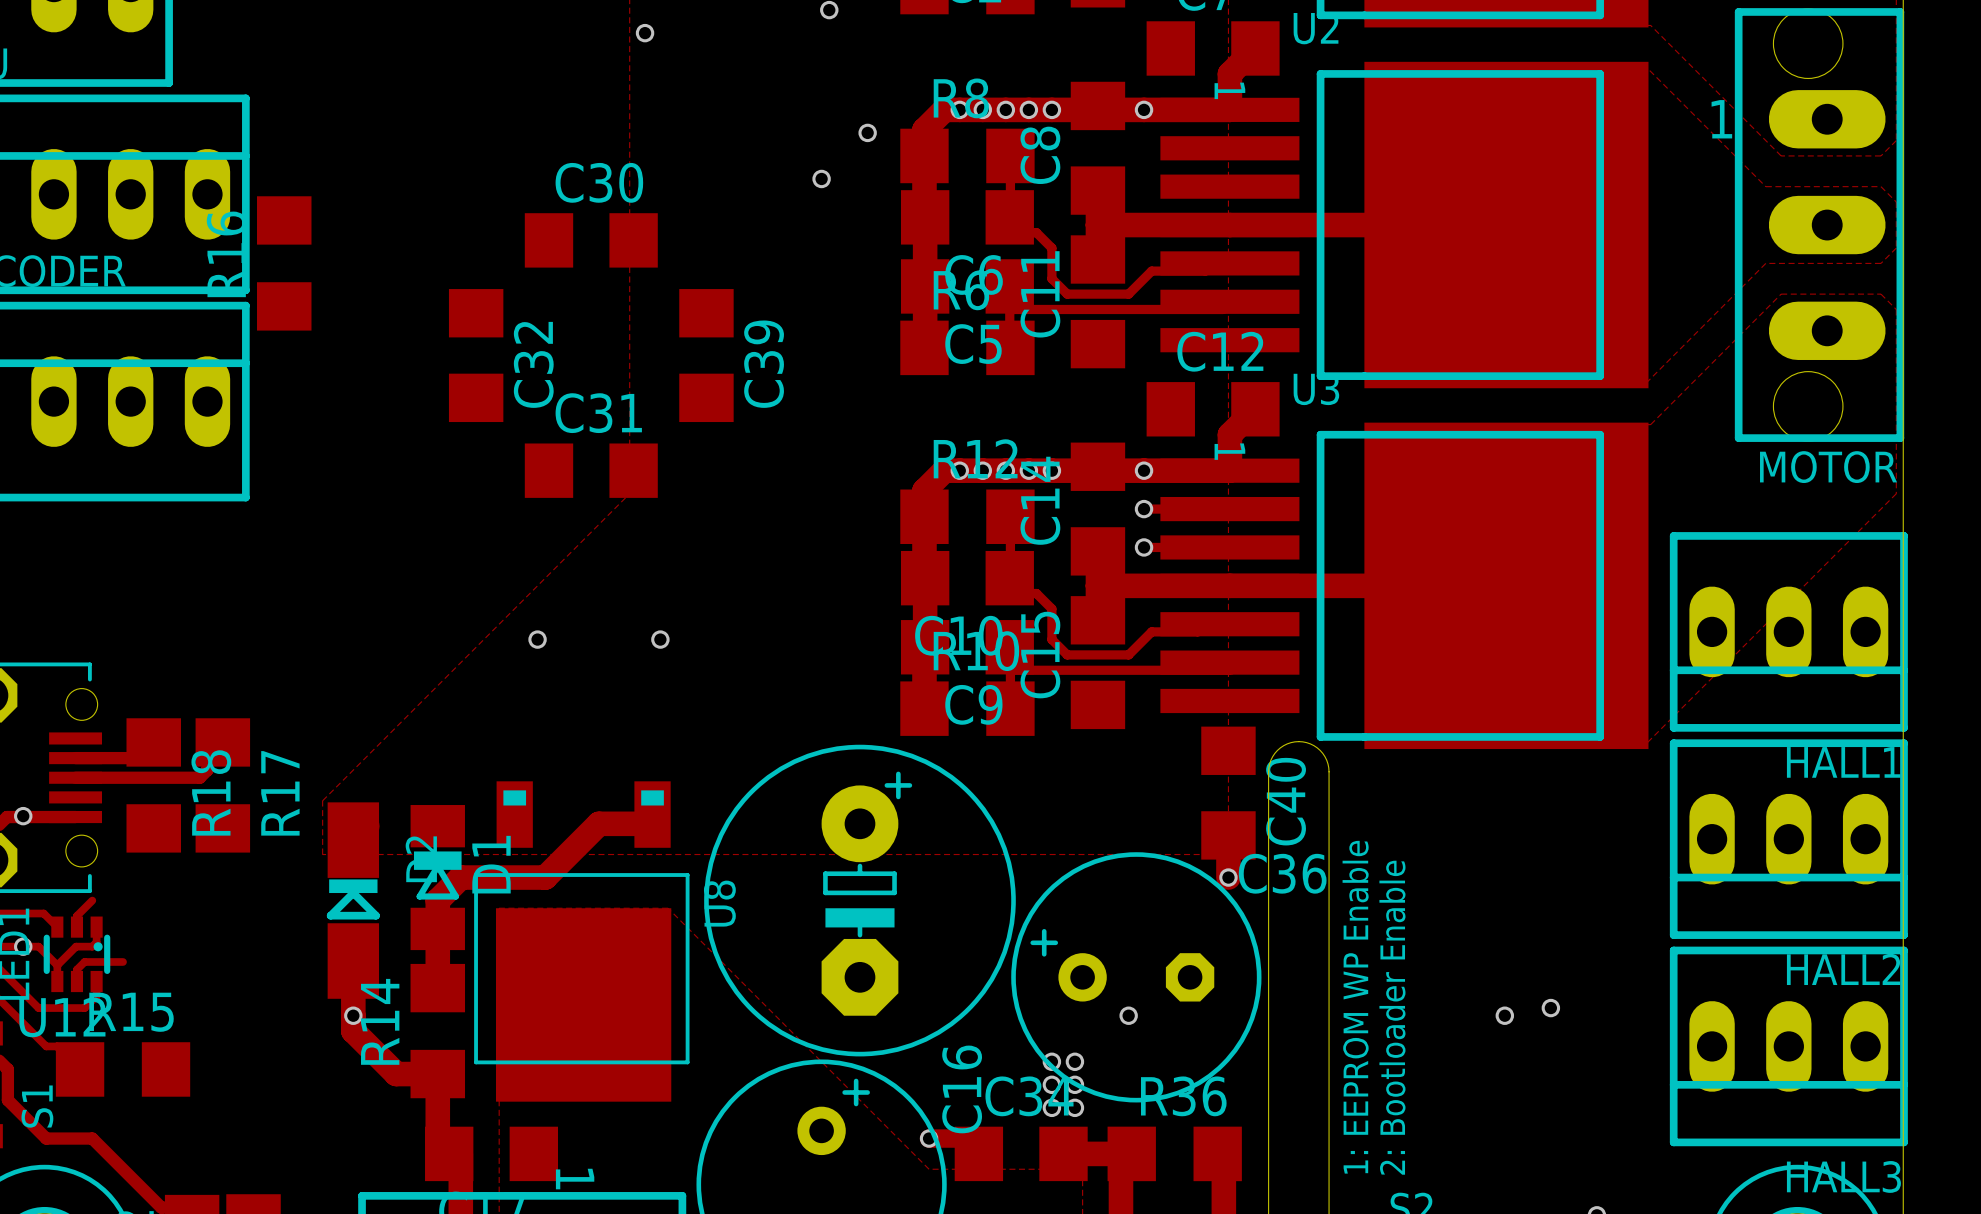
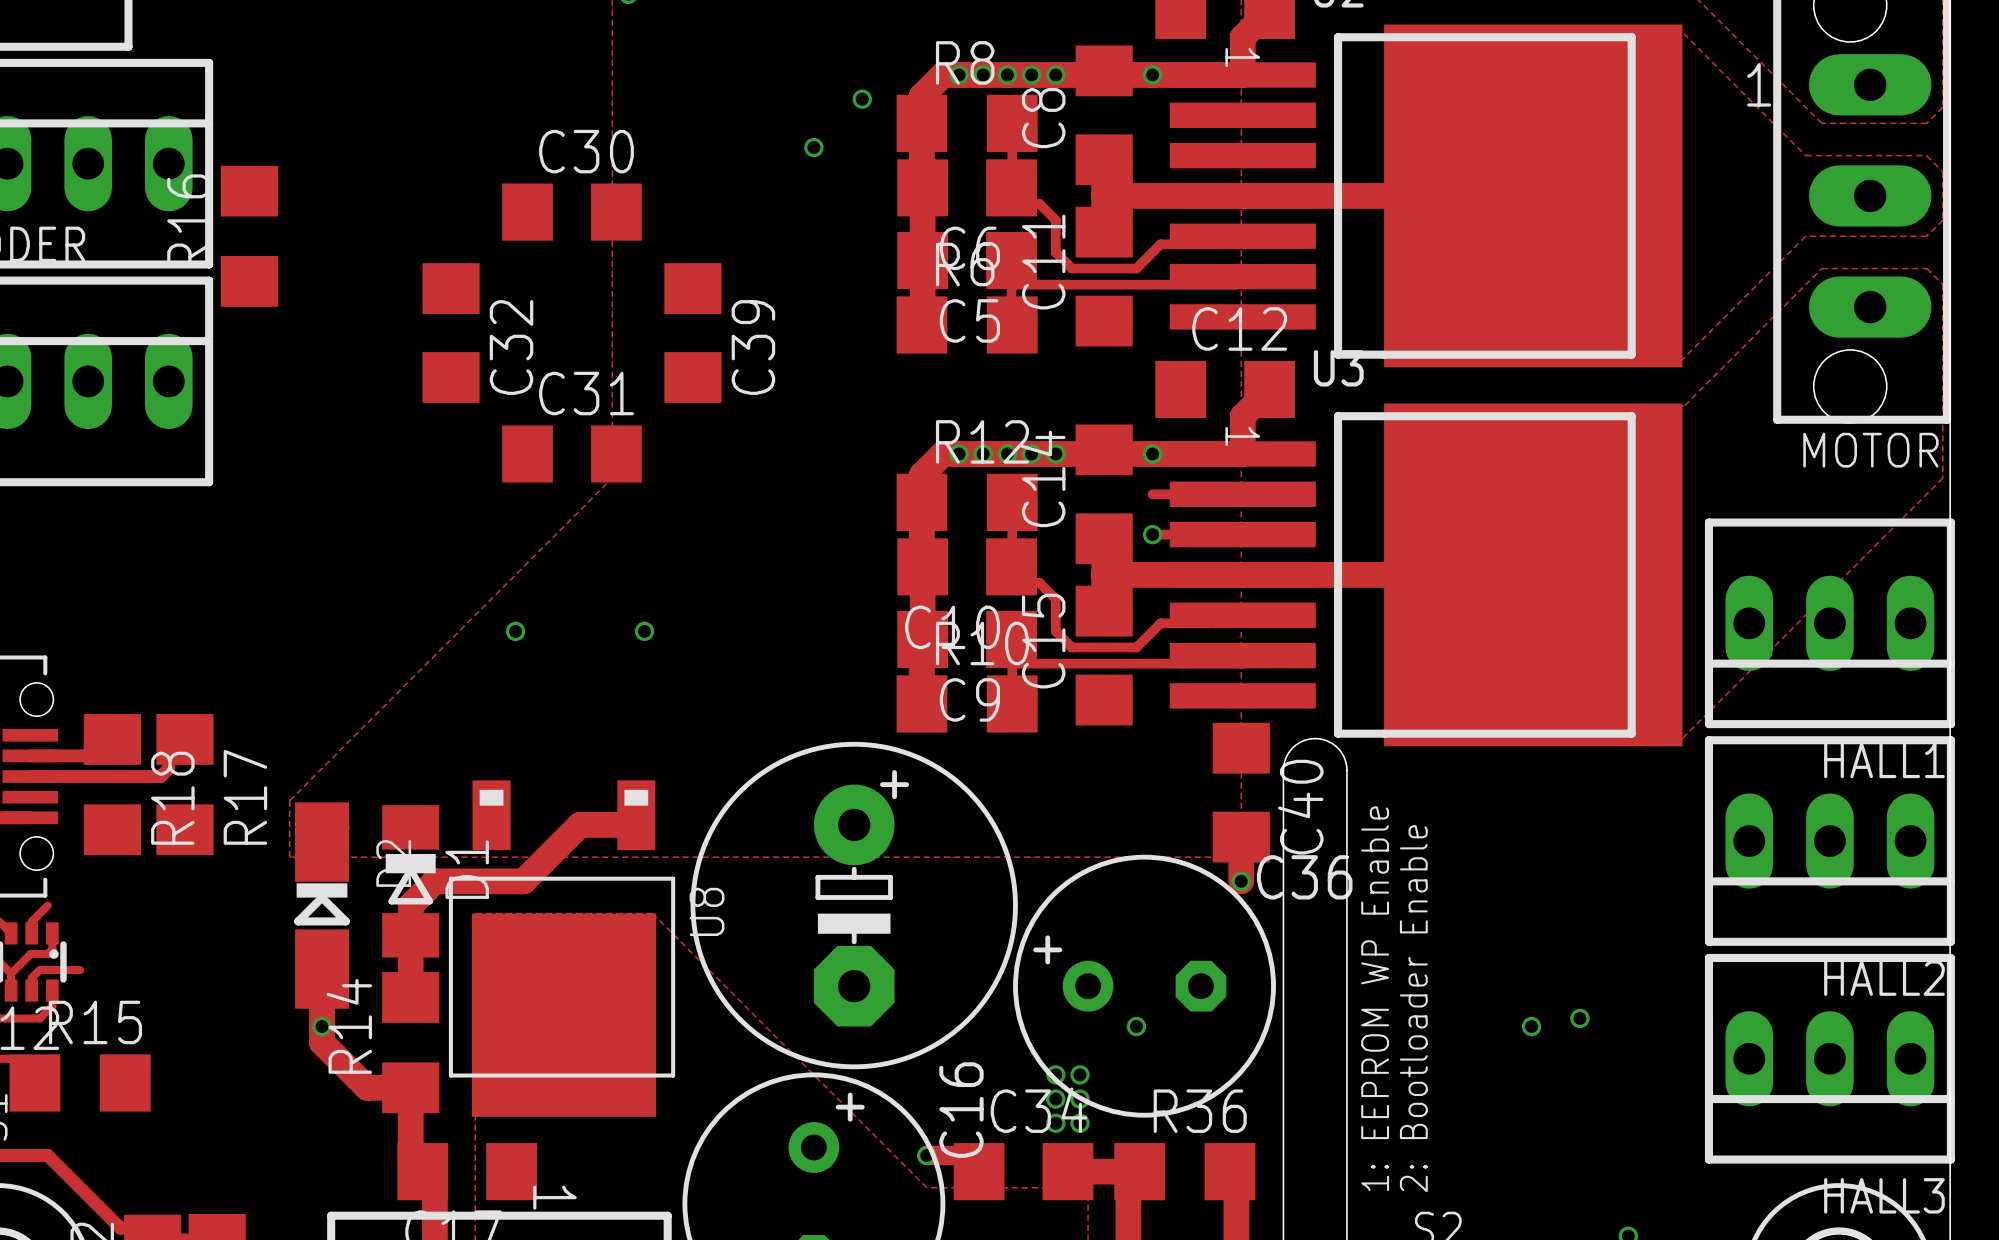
via: (1144, 509) -> none

